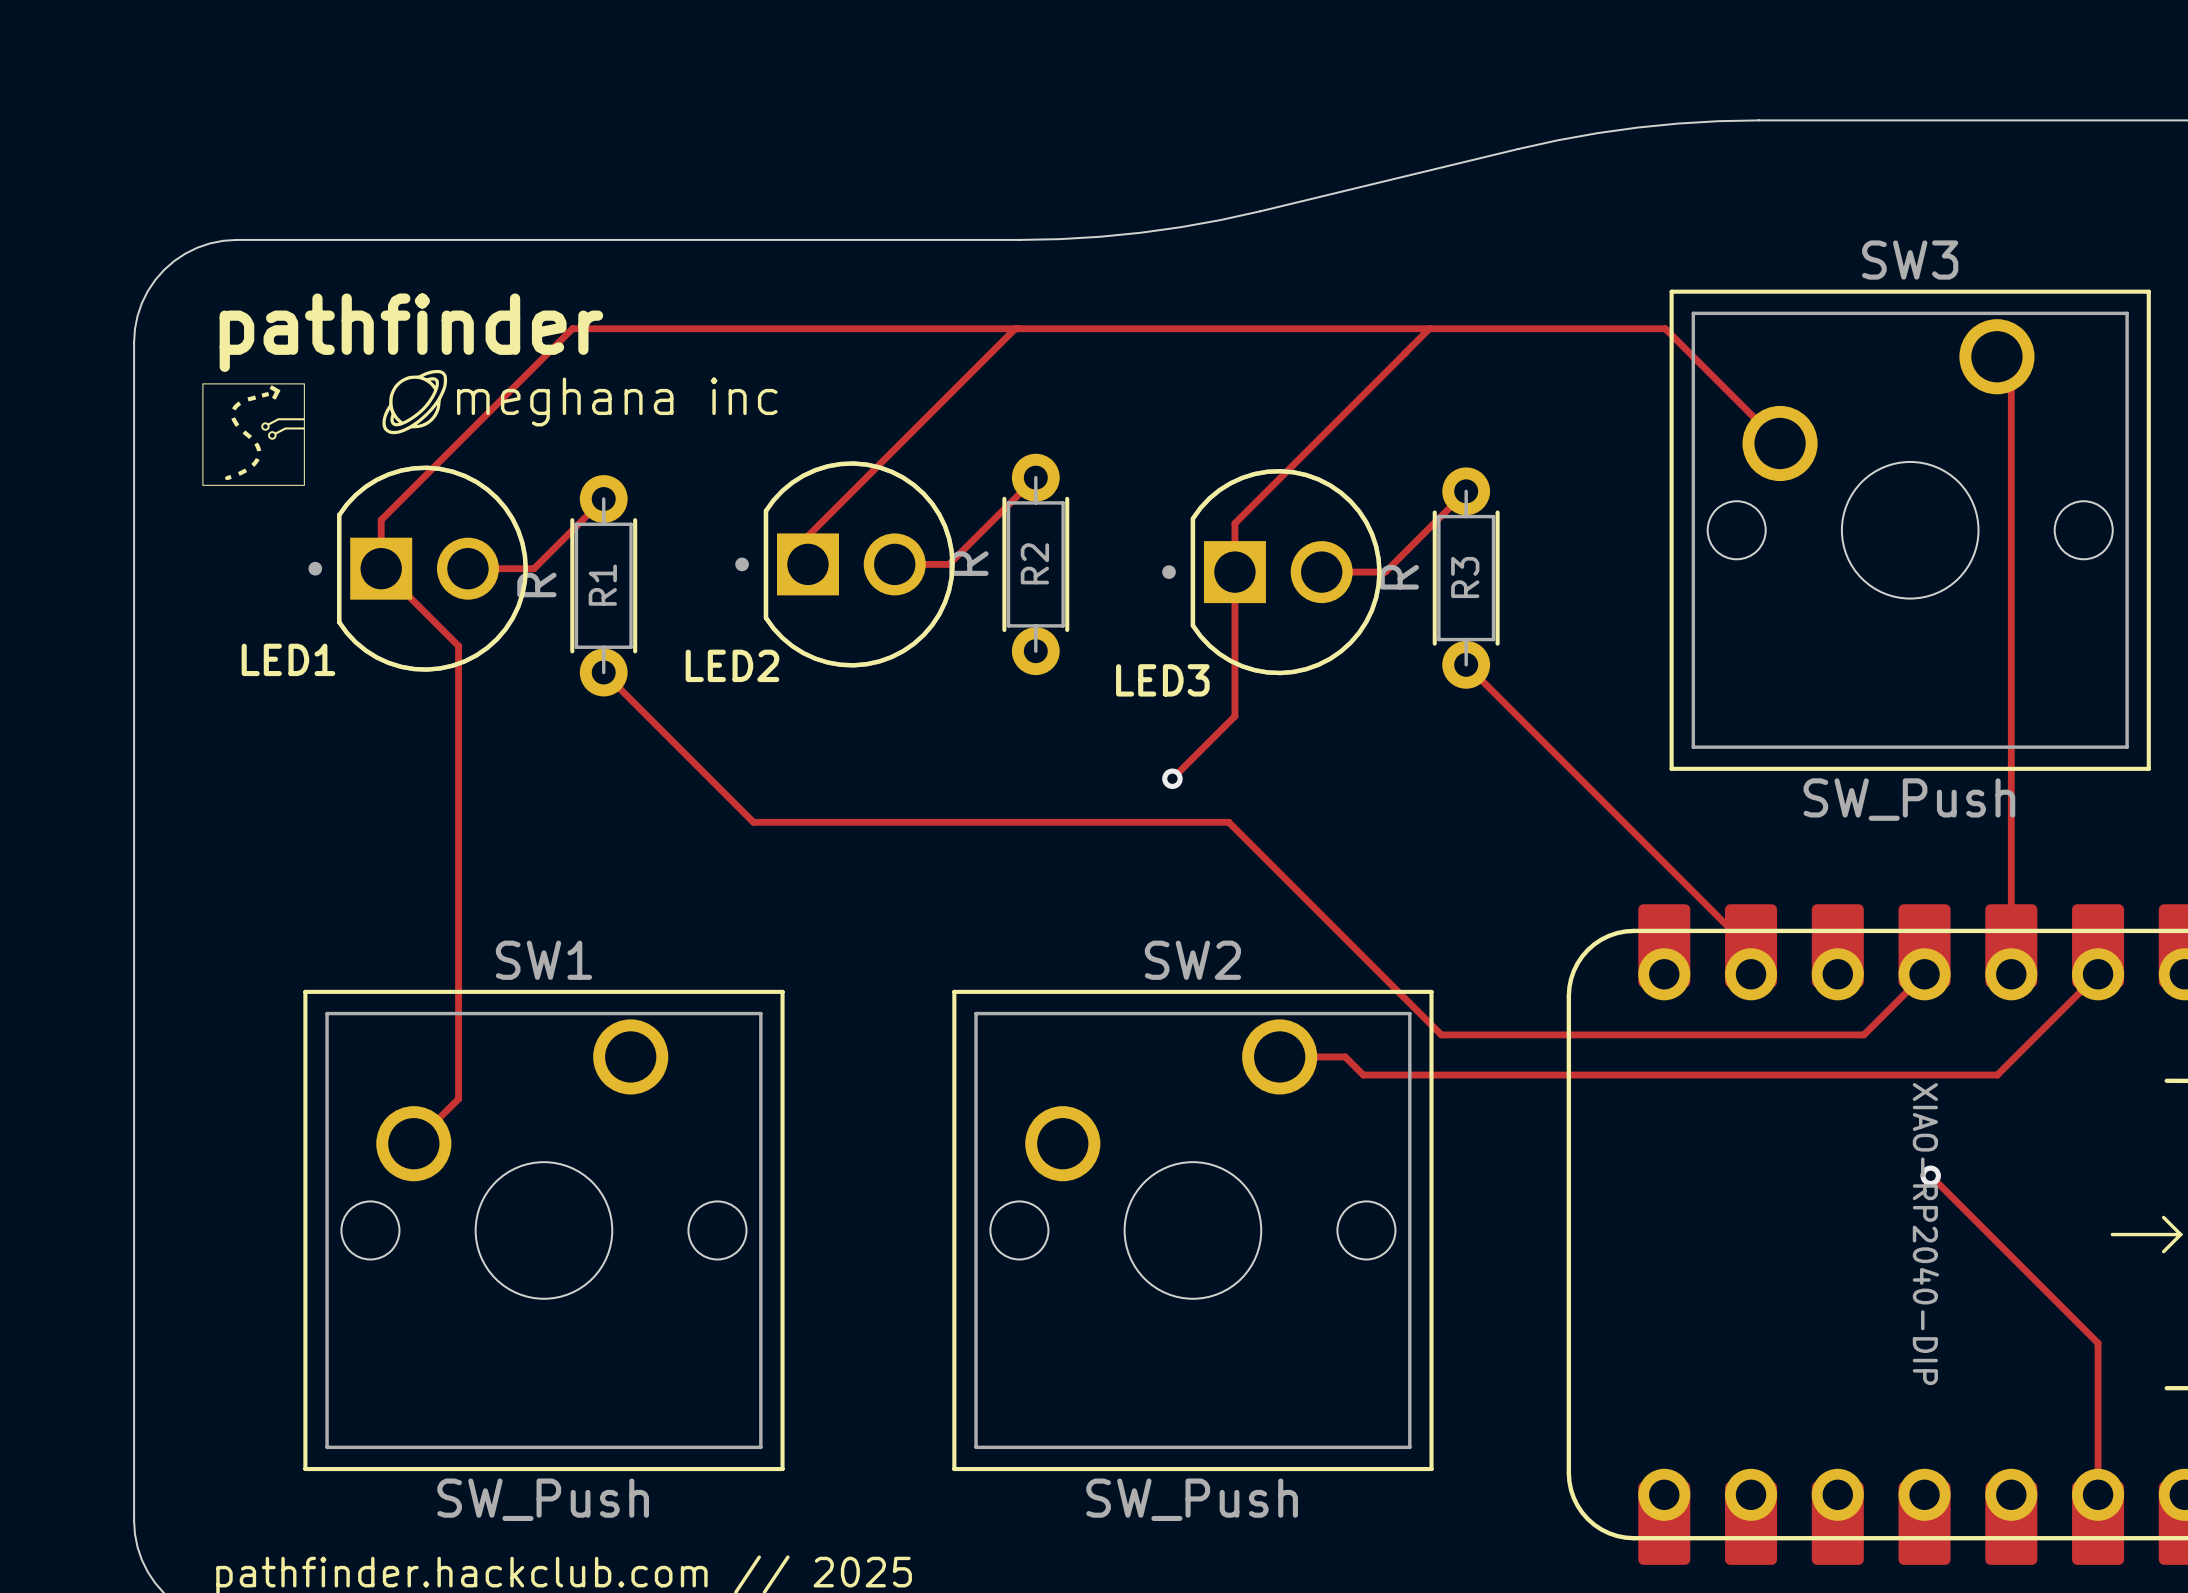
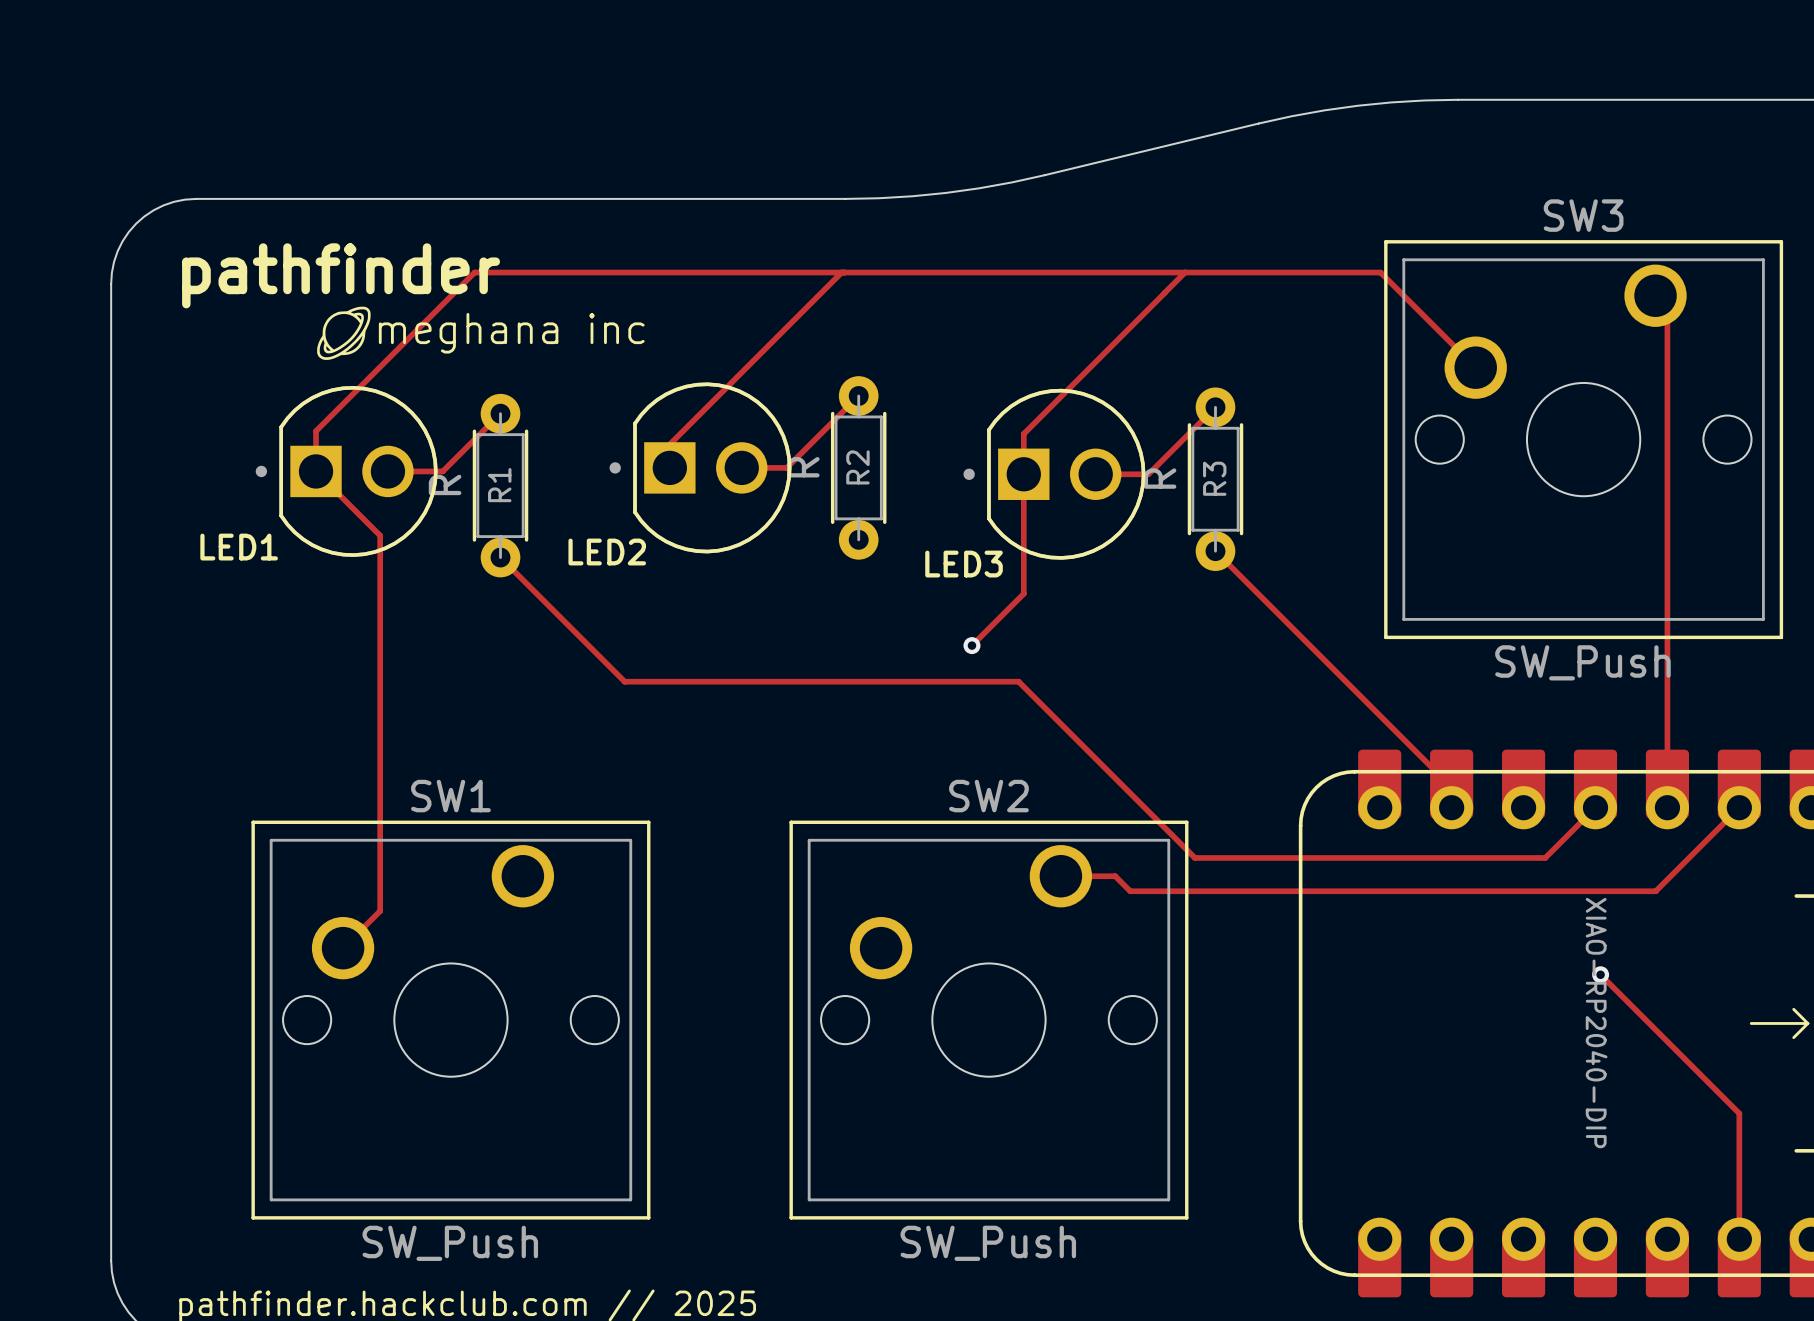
drawing: [202, 383, 305, 486] -> none

